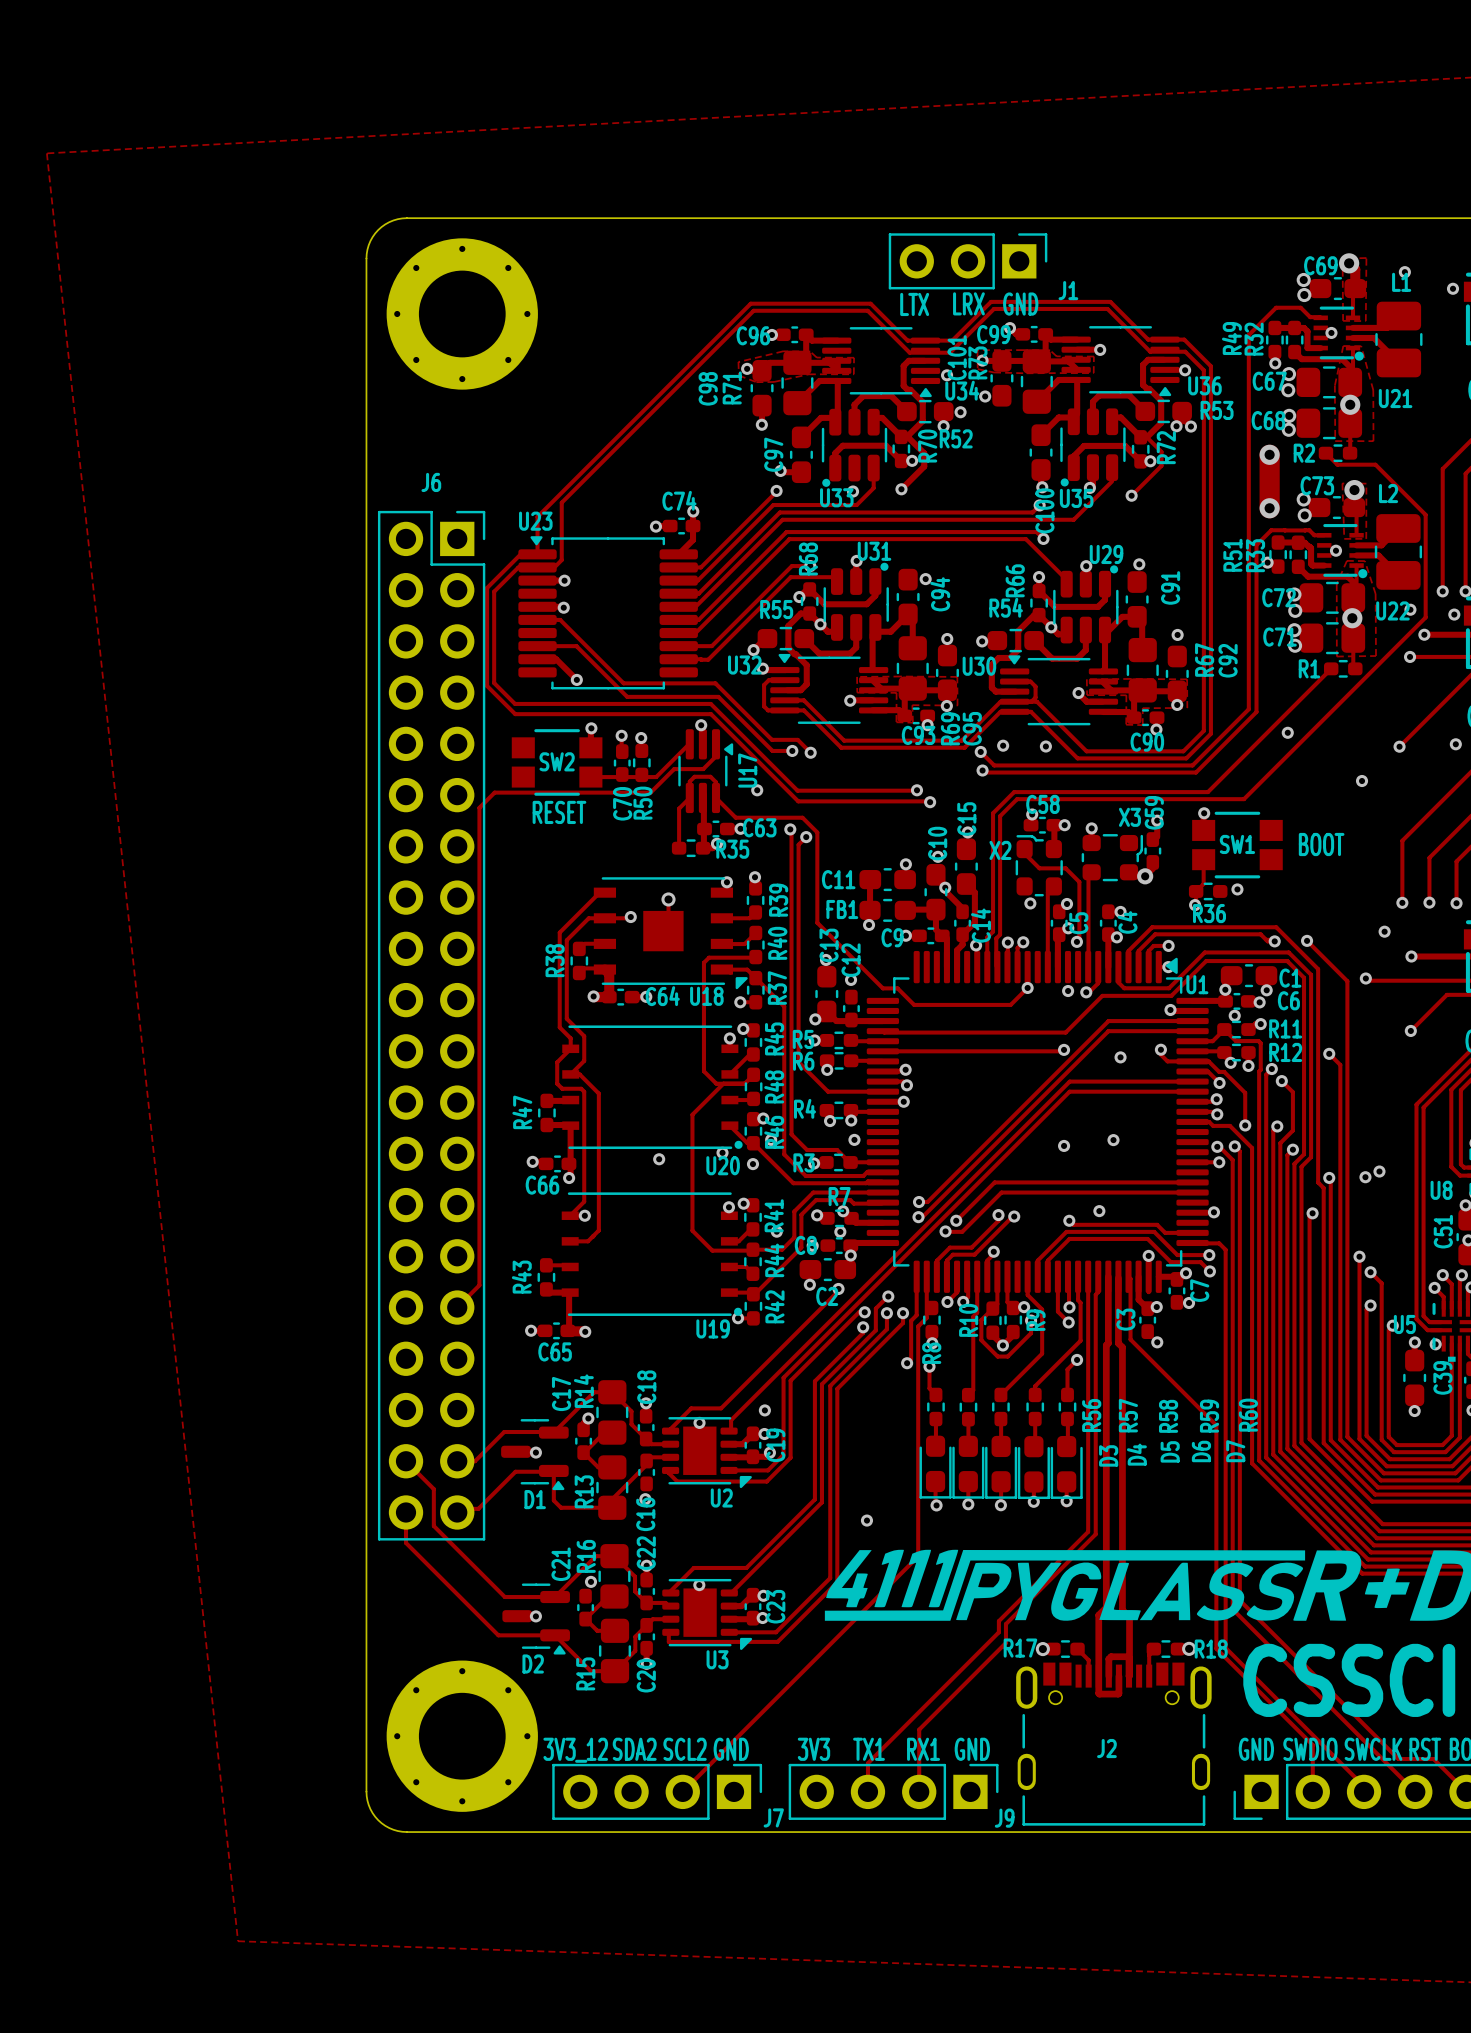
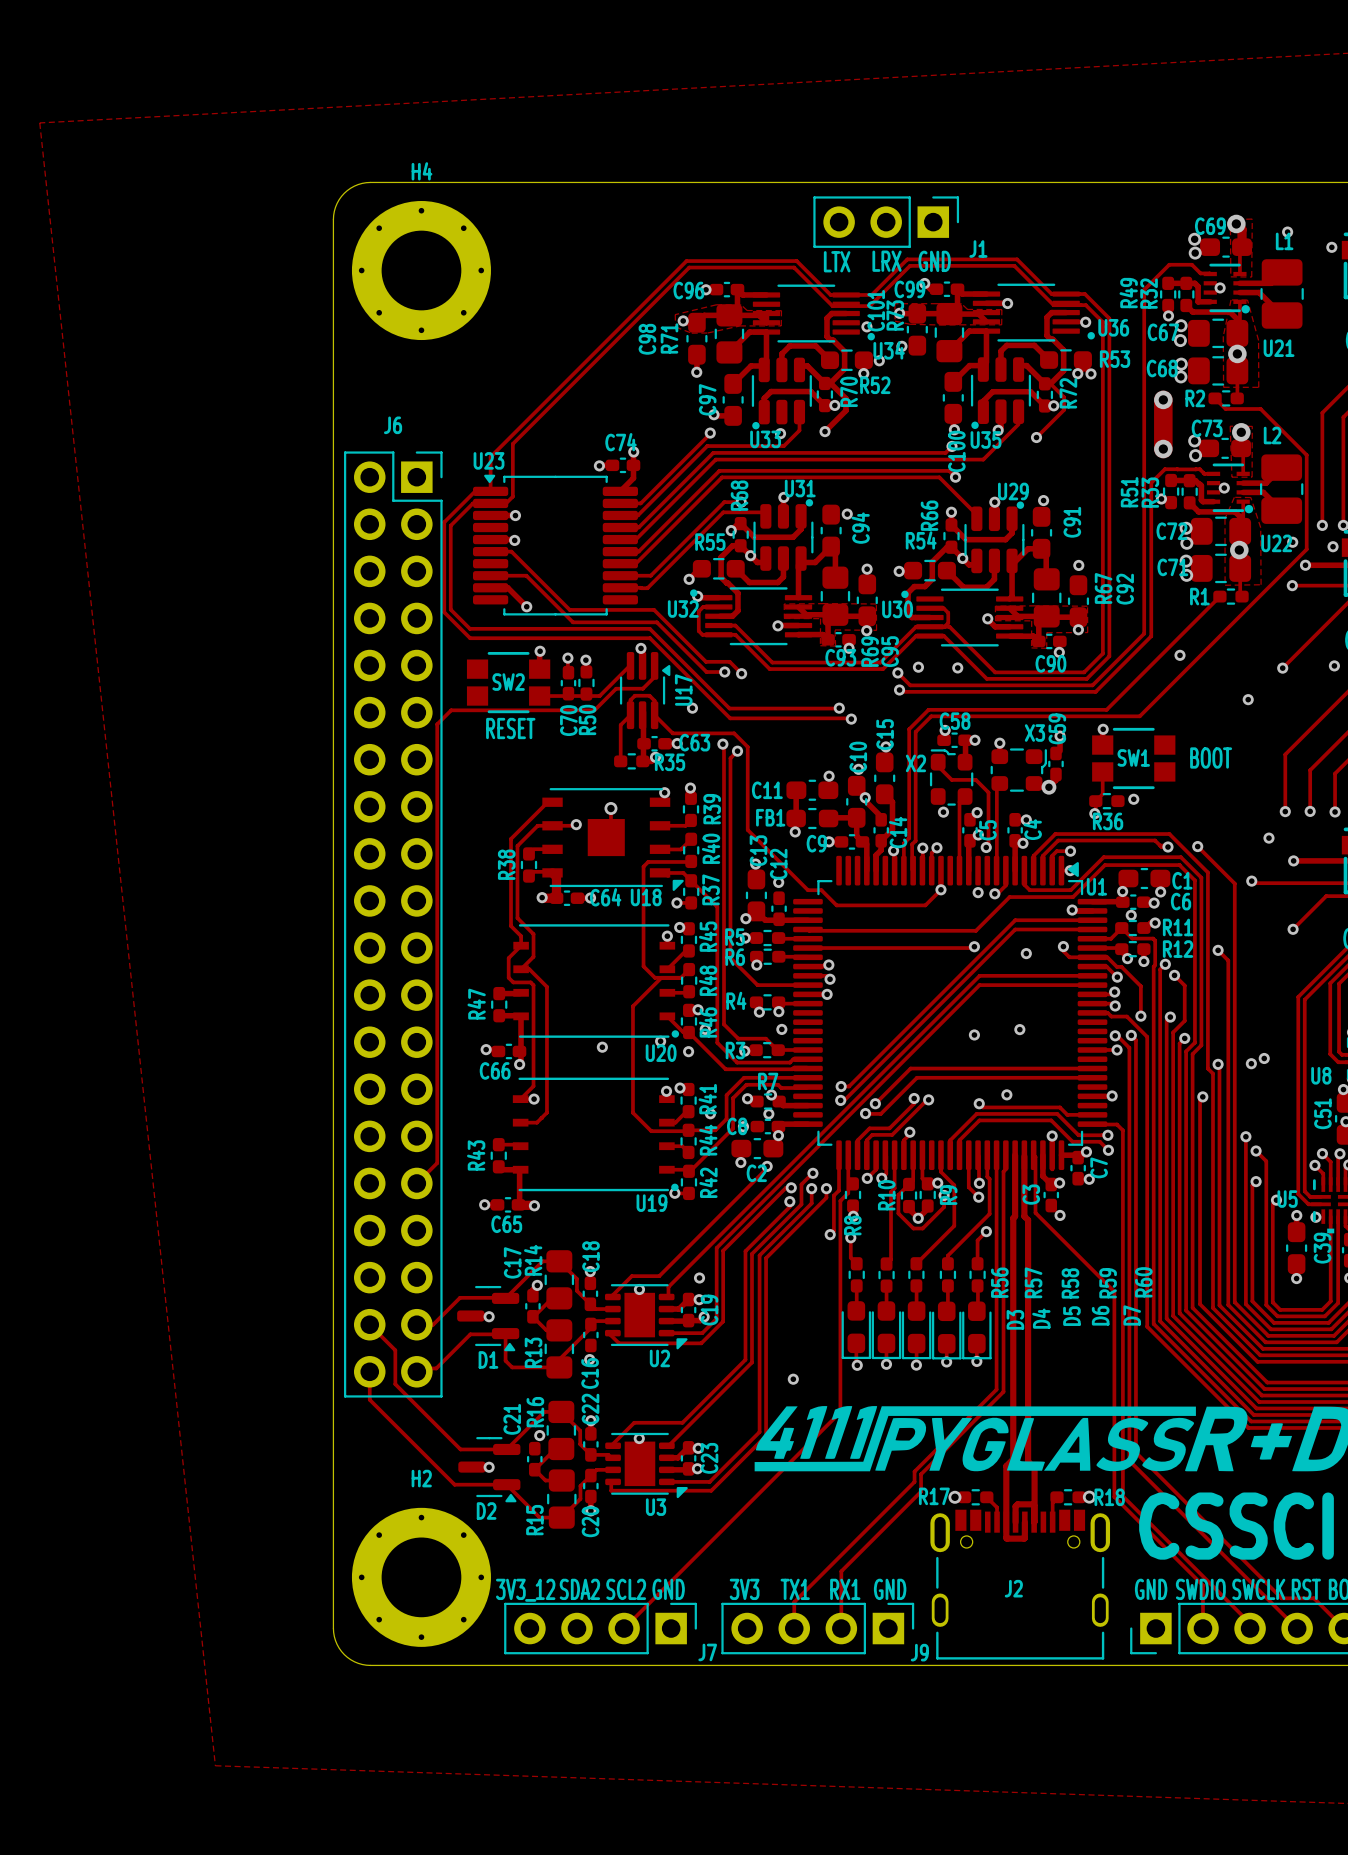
H4 name: none -> H4 (422, 171)
U36 footprint: [1061, 326, 1180, 397] -> [972, 283, 1095, 342]
U34 footprint: [822, 327, 941, 398] -> [752, 284, 875, 343]
U32 footprint: [770, 653, 889, 724] -> [690, 587, 813, 646]
U30 footprint: [1000, 655, 1119, 726] -> [901, 588, 1024, 647]
H2 name: none -> H2 (421, 1478)

